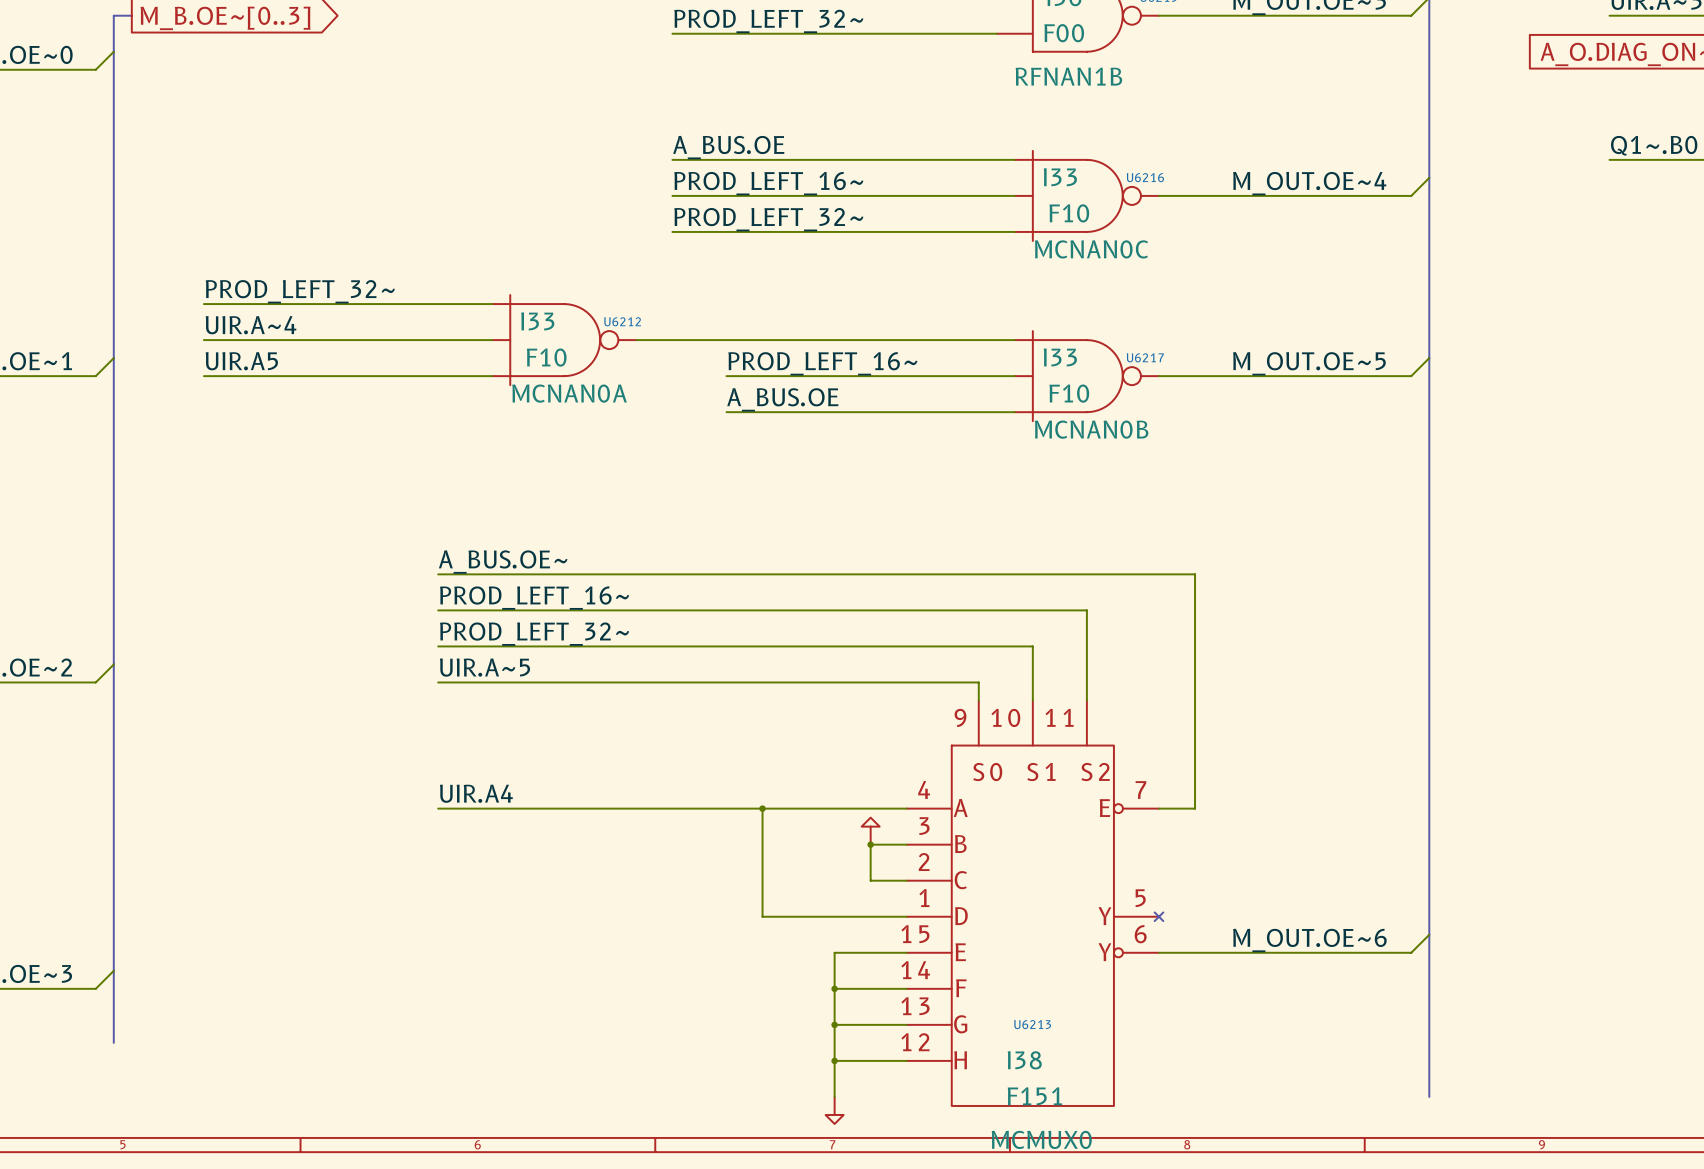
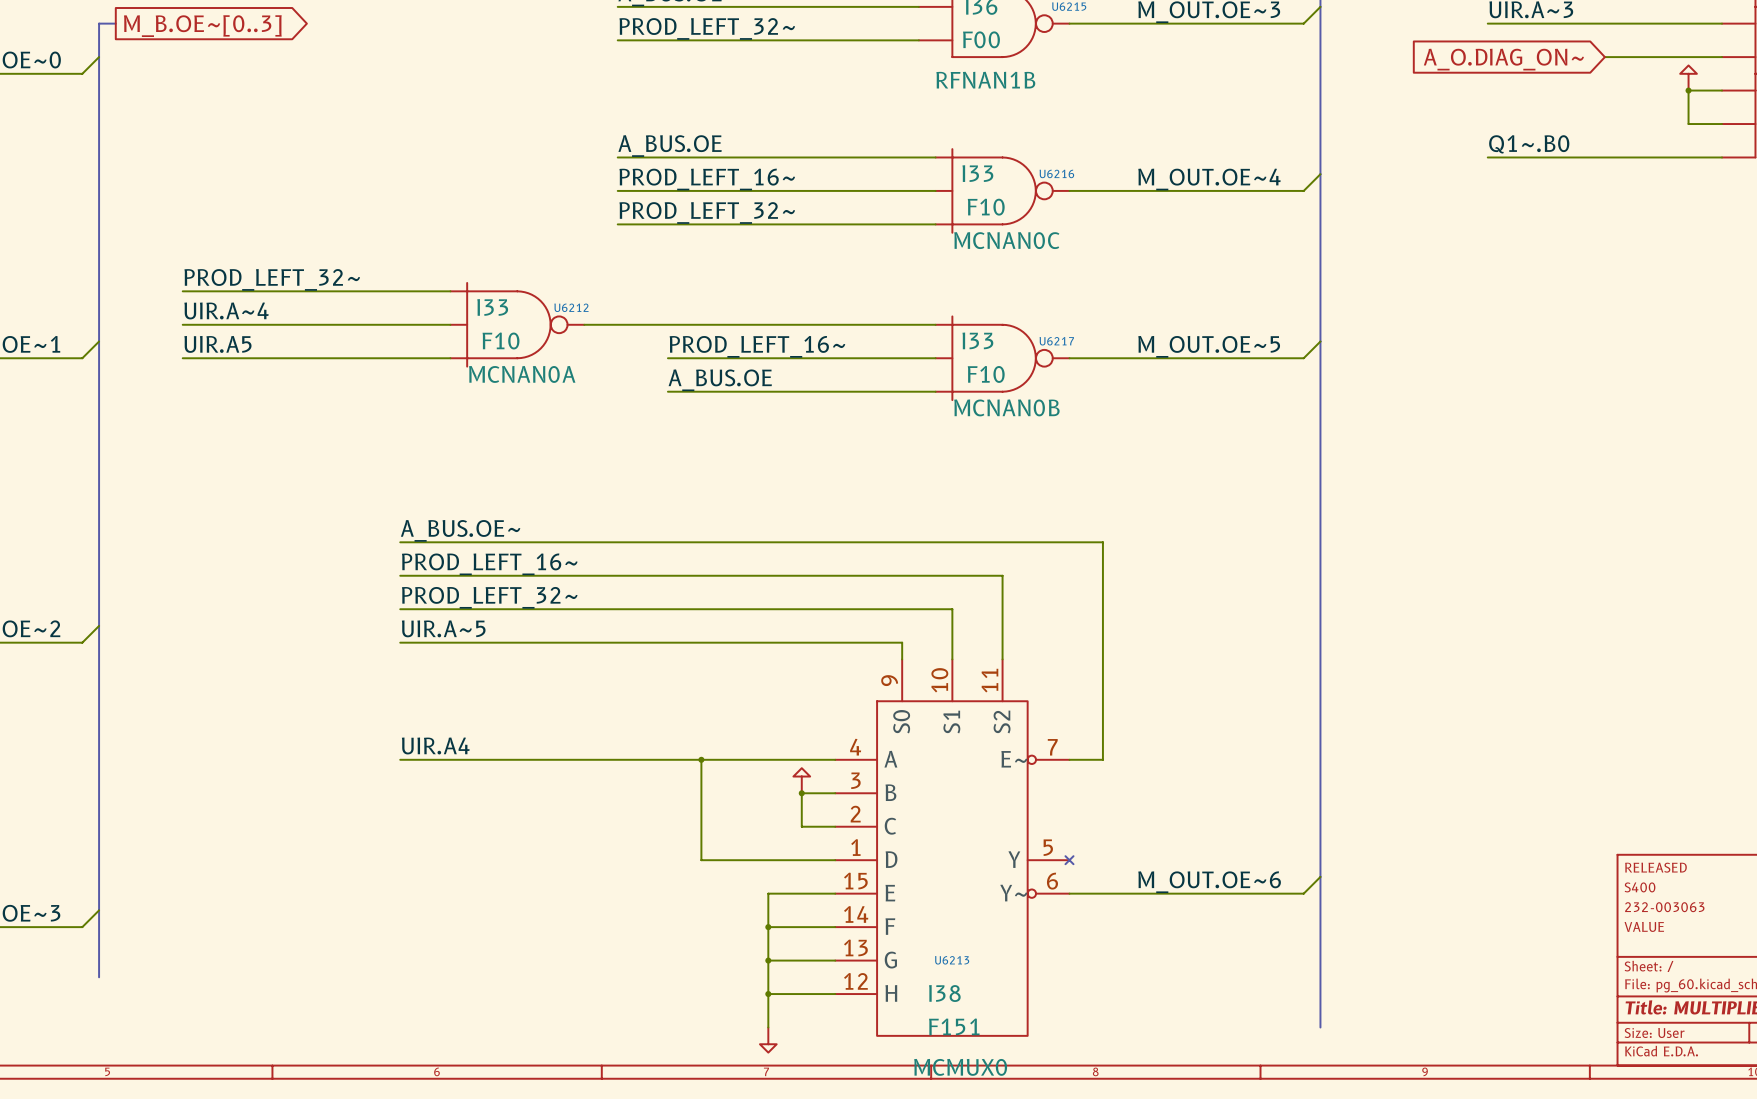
U6213 symbol: [906, 700, 1159, 1106] -> [835, 659, 1070, 1036]

